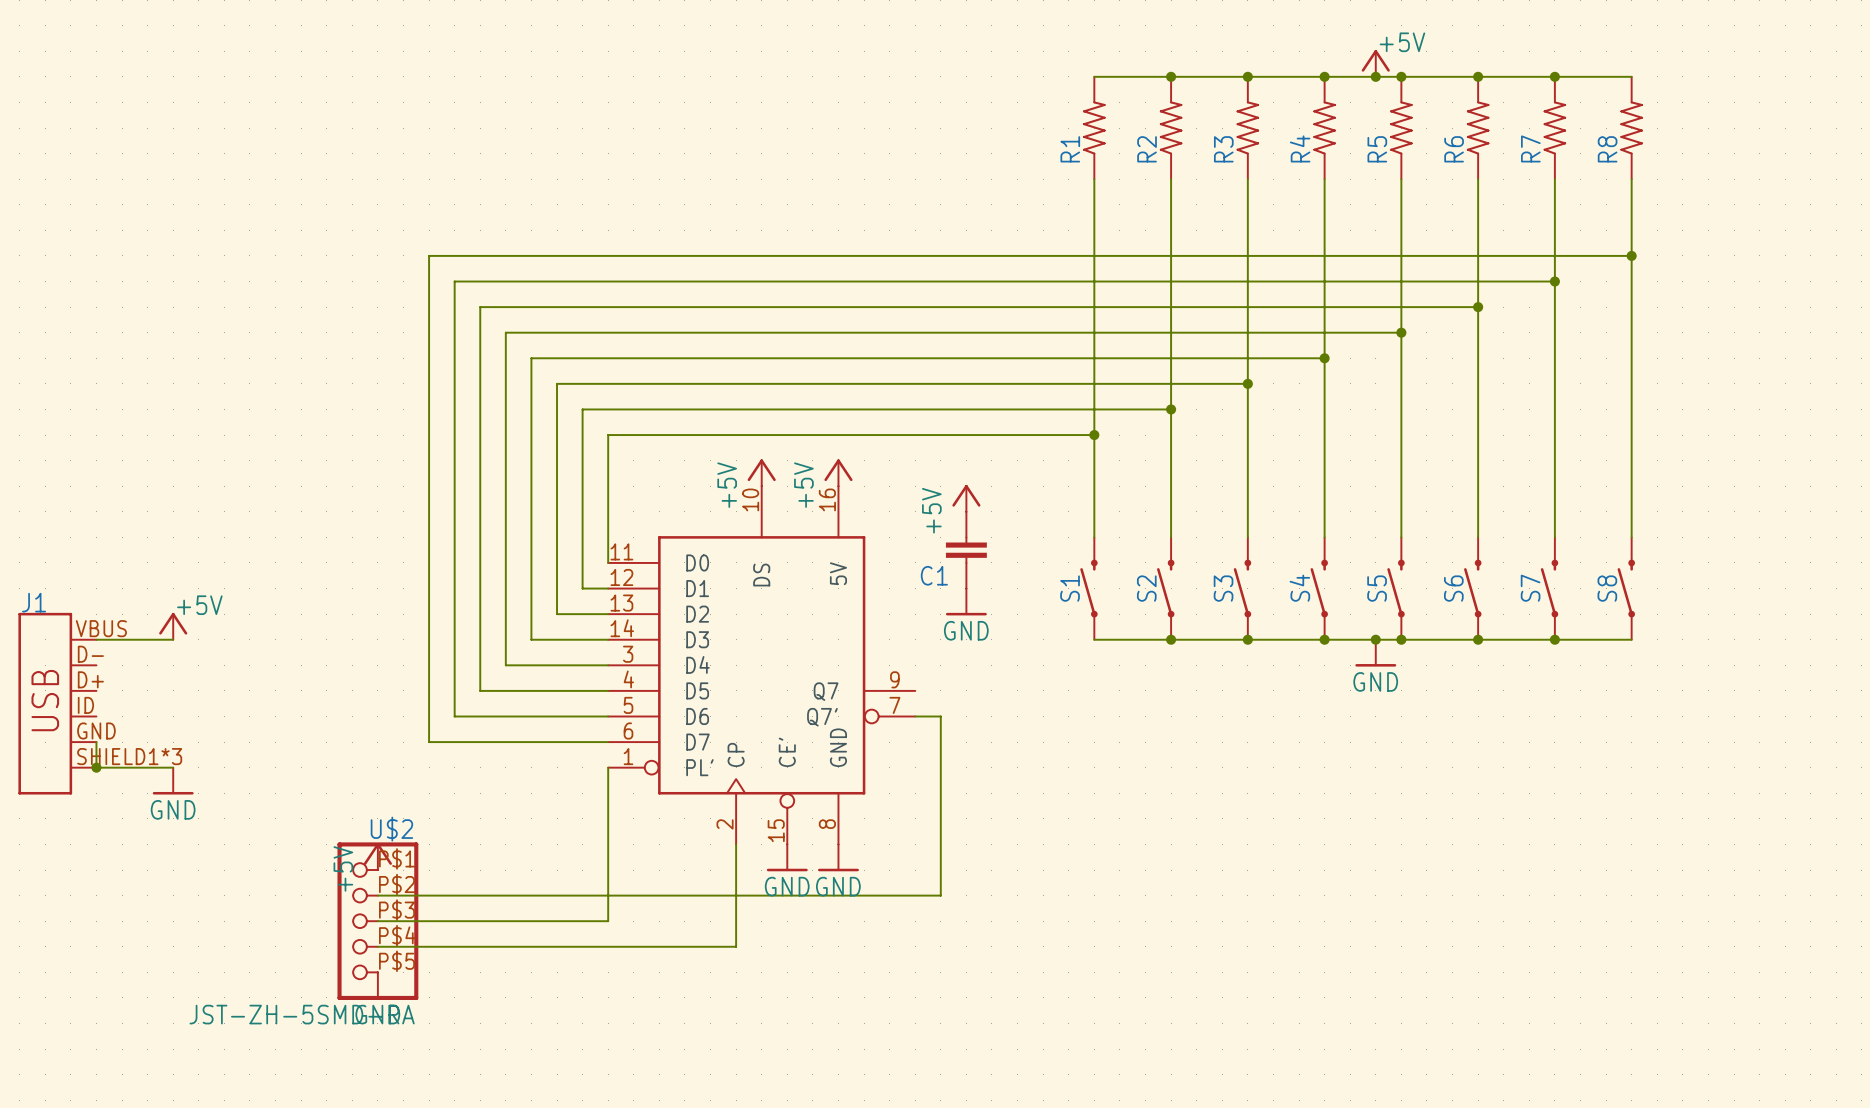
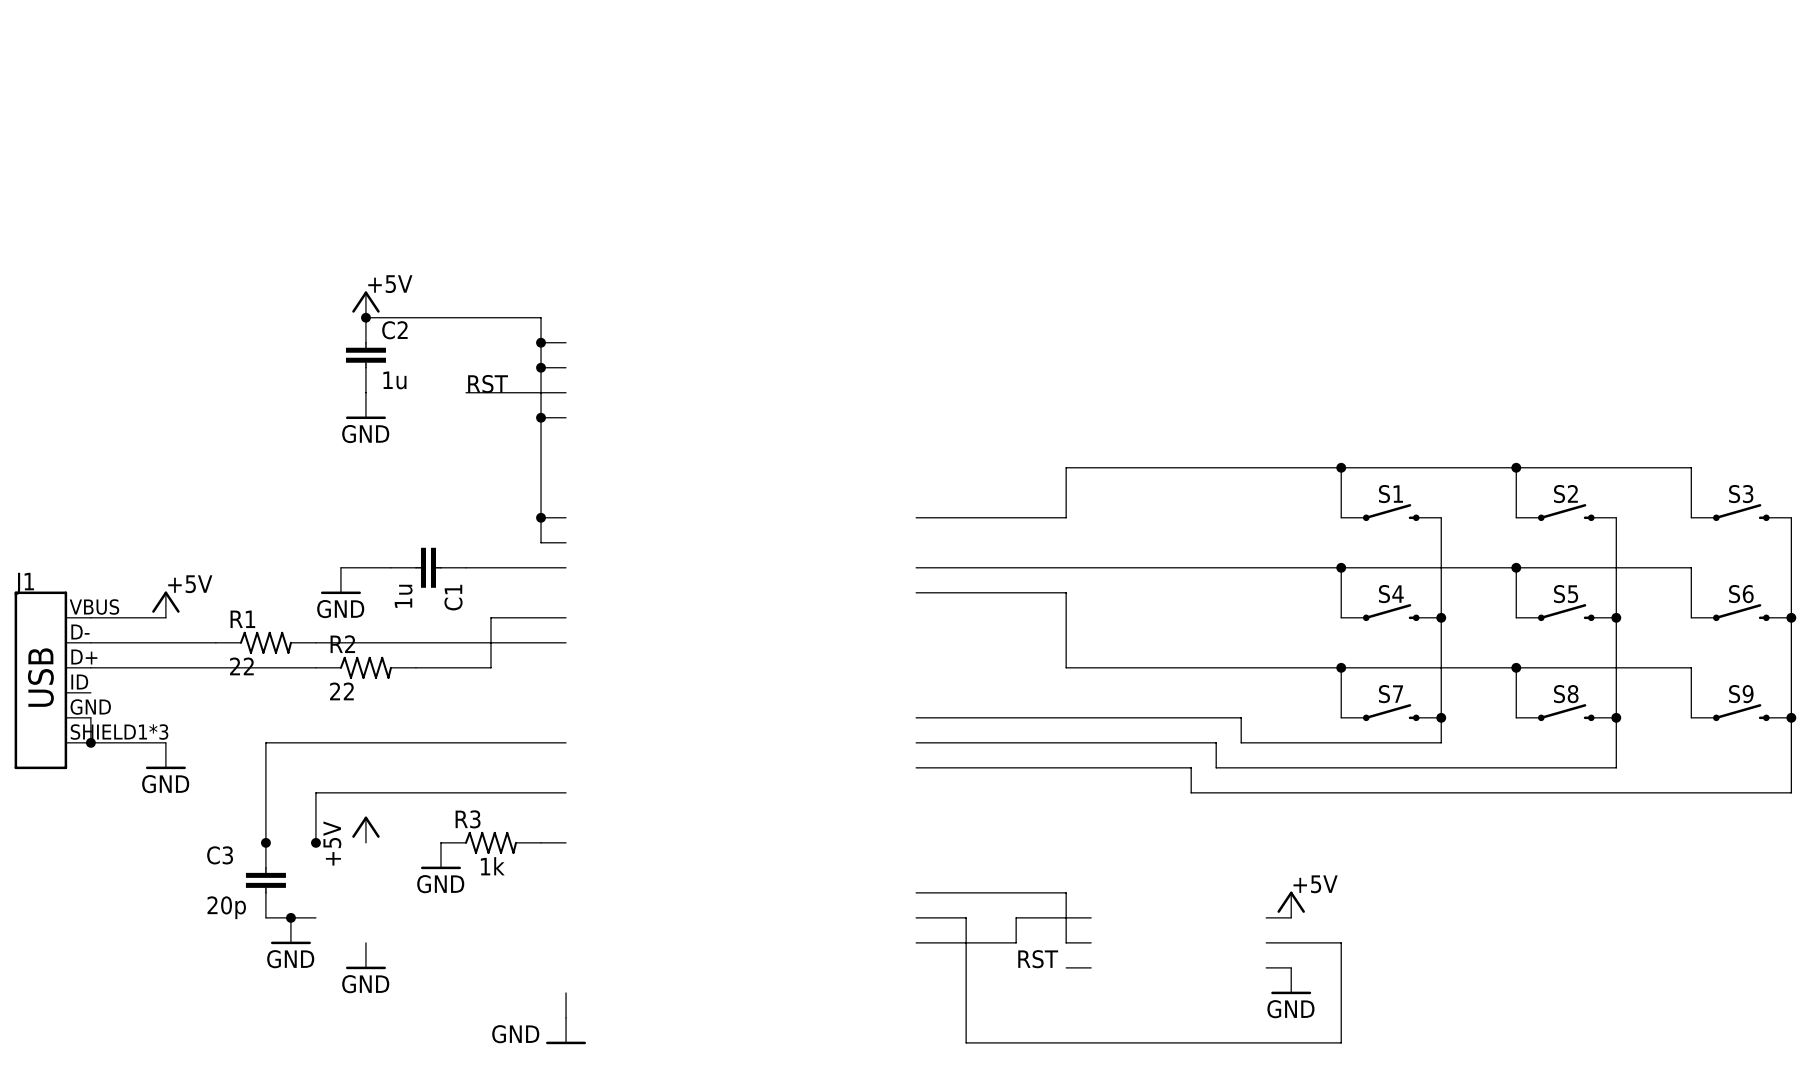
power symbol: +5V (1375, 63) -> none
wire: (1094, 76) (1631, 76) -> none
junction: (1171, 76) -> none
junction: (1247, 76) -> none
junction: (1324, 76) -> none
junction: (1375, 76) -> none
junction: (1401, 76) -> none
junction: (1478, 76) -> none
junction: (1554, 76) -> none
R1 rotation: 0° (1094, 128) -> 90° clockwise (265, 642)
R1 position: (1094, 128) -> (265, 642)
R2 rotation: 0° (1171, 128) -> 90° clockwise (365, 667)
R2 position: (1171, 128) -> (365, 667)
R3 rotation: 0° (1247, 128) -> 90° clockwise (491, 842)
R3 position: (1247, 128) -> (491, 842)
R4: (1324, 128) -> none
R5: (1401, 128) -> none
R6: (1478, 128) -> none
R7: (1554, 128) -> none
R8: (1631, 128) -> none
wire: (1094, 179) (1094, 486) -> (1691, 517) (1691, 467) (1066, 467)
wire: (1171, 179) (1171, 537) -> none
wire: (1247, 179) (1247, 537) -> none
wire: (1324, 179) (1324, 537) -> none
wire: (1401, 179) (1401, 537) -> none
wire: (1478, 179) (1478, 537) -> (916, 717) (1241, 717) (1241, 742) (1441, 742) (1441, 517)
wire: (1554, 179) (1554, 486) -> none
wire: (1631, 179) (1631, 537) -> none
wire: (1631, 255) (429, 255) (429, 742) (608, 742) -> none
junction: (1631, 255) -> none
wire: (1554, 281) (454, 281) (454, 716) (608, 716) -> none
junction: (1554, 281) -> none
wire: (1478, 307) (480, 307) (480, 690) -> (415, 667) (465, 667)
junction: (1478, 307) -> none
power symbol: none -> +5V (365, 304)
junction: none -> (365, 317)
wire: (505, 332) (505, 639) -> (491, 317) (365, 317)
wire: (557, 332) (1401, 332) -> (541, 317) (541, 367)
junction: (1401, 332) -> none
wire: (557, 358) (531, 358) (531, 639) -> (491, 617) (516, 617)
junction: none -> (541, 342)
wire: (582, 358) (1324, 358) -> none
junction: (1324, 358) -> none
C2: none -> 1u (365, 355)
junction: none -> (541, 367)
wire: (582, 383) (1247, 383) -> none
junction: (1247, 383) -> none
label: none -> RST (488, 384)
wire: none -> (465, 392) (566, 392)
wire: (1171, 409) (582, 409) (582, 588) (608, 588) -> none
junction: (1171, 409) -> none
power symbol: none -> GND (365, 405)
wire: none -> (541, 417) (566, 417)
junction: none -> (541, 417)
wire: (1094, 435) (608, 435) (608, 562) -> none
junction: (1094, 435) -> none
power symbol: +5V (761, 472) -> none
power symbol: +5V (838, 472) -> none
wire: none -> (1341, 467) (1341, 517)
junction: none -> (1341, 467)
junction: none -> (1516, 467)
power symbol: +5V (966, 498) -> none
junction: none -> (541, 517)
wire: none -> (916, 517) (1066, 517)
wire: none -> (1616, 517) (1616, 767) (1216, 767) (1216, 742) (916, 742)
wire: none -> (1791, 517) (1791, 792) (1191, 792) (1191, 767) (916, 767)
C1 rotation: 0° (966, 550) -> 90° clockwise (428, 567)
C1 position: (966, 550) -> (428, 567)
wire: (557, 562) (557, 614) (608, 614) -> (541, 542) (566, 542)
C1 name position: C1 (934, 575) -> C1 (453, 597)
wire: none -> (340, 567) (390, 567)
wire: none -> (465, 567) (566, 567)
wire: none -> (916, 567) (1691, 567) (1691, 617)
S1 rotation: 0° (1088, 588) -> 90° clockwise (1391, 512)
S1 position: (1088, 588) -> (1391, 512)
S2 rotation: 0° (1165, 588) -> 90° clockwise (1566, 512)
S2 position: (1165, 588) -> (1566, 512)
S3 rotation: 0° (1242, 588) -> 90° clockwise (1741, 512)
S3 position: (1242, 588) -> (1741, 512)
S4 rotation: 0° (1319, 588) -> 90° clockwise (1391, 612)
S4 position: (1319, 588) -> (1391, 612)
wire: none -> (1341, 567) (1341, 617)
junction: none -> (1341, 567)
S5 rotation: 0° (1395, 588) -> 90° clockwise (1566, 612)
S5 position: (1395, 588) -> (1566, 612)
S6 rotation: 0° (1472, 588) -> 90° clockwise (1741, 612)
S6 position: (1472, 588) -> (1741, 612)
S7 rotation: 0° (1549, 588) -> 90° clockwise (1391, 712)
S7 position: (1549, 588) -> (1391, 712)
junction: none -> (1516, 567)
S8 rotation: 0° (1626, 588) -> 90° clockwise (1566, 712)
S8 position: (1626, 588) -> (1566, 712)
power symbol: none -> GND (340, 580)
power symbol: GND (966, 601) -> none
wire: none -> (916, 592) (1066, 592) (1066, 667) (1691, 667) (1691, 717)
C1 value: none -> 1u (403, 596)
wire: (582, 639) (608, 639) -> (541, 517) (566, 517)
wire: (1094, 639) (1631, 639) -> none
junction: (1171, 639) -> none
junction: (1247, 639) -> none
junction: (1324, 639) -> none
junction: (1375, 639) -> none
junction: (1401, 639) -> none
junction: (1554, 639) -> none
junction: none -> (1616, 617)
junction: none -> (1791, 617)
power symbol: GND (1375, 653) -> none
wire: none -> (90, 642) (215, 642)
wire: (582, 665) (608, 665) -> (541, 842) (566, 842)
part: (761, 665) -> none
R1 value: none -> 22 (241, 666)
wire: none -> (90, 667) (315, 667)
wire: (505, 690) (608, 690) -> (491, 667) (491, 642) (315, 642)
wire: none -> (1341, 667) (1341, 717)
junction: none -> (1341, 667)
wire: none -> (1516, 667) (1516, 717)
junction: none -> (1516, 667)
R2 value: none -> 22 (341, 691)
wire: (915, 716) (940, 716) (940, 895) (377, 895) -> none
S9: none -> (1741, 712)
junction: none -> (1441, 717)
junction: none -> (1616, 717)
junction: none -> (1791, 717)
wire: none -> (566, 742) (265, 742) (265, 842)
wire: (608, 767) (608, 921) (377, 921) -> none
wire: none -> (566, 792) (315, 792) (315, 842)
wire: (736, 844) (736, 946) (377, 946) -> none
power symbol: GND (787, 857) -> none
power symbol: GND (838, 857) -> none
junction: none -> (265, 842)
junction: none -> (315, 842)
power symbol: none -> GND (440, 856)
R3 value: none -> 1k (492, 866)
C3: none -> 20p (265, 880)
U$2: JST-ZH-5SMD-RA (377, 921) -> none
wire: none -> (916, 892) (1066, 892) (1066, 942) (1091, 942)
power symbol: none -> +5V (1291, 904)
wire: none -> (265, 917) (315, 917)
junction: none -> (290, 917)
wire: none -> (916, 917) (966, 917) (966, 1042) (1341, 1042) (1341, 942) (1266, 942)
wire: none -> (1091, 917) (1016, 917) (1016, 942) (916, 942)
wire: none -> (1266, 917) (1291, 917)
power symbol: none -> GND (290, 931)
label: none -> RST (1038, 959)
wire: none -> (1066, 967) (1091, 967)
wire: none -> (1266, 967) (1291, 967)
power symbol: none -> GND (1291, 981)
wire: none -> (566, 992) (566, 1017)
power symbol: none -> GND (566, 1031)

